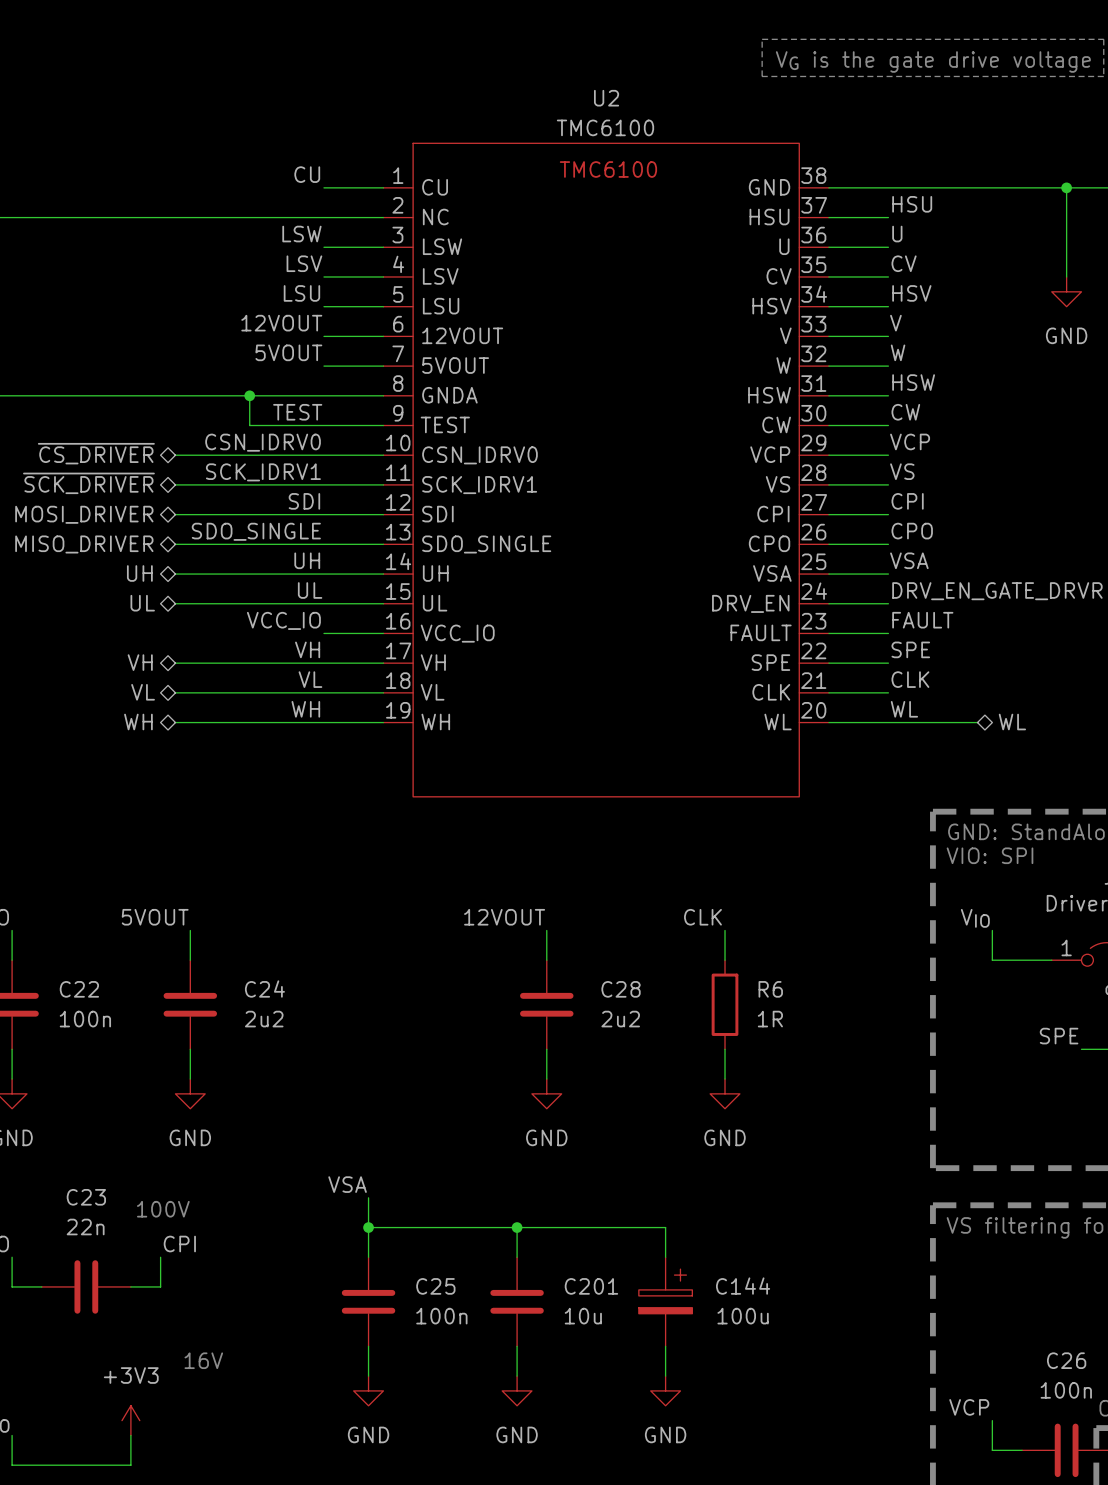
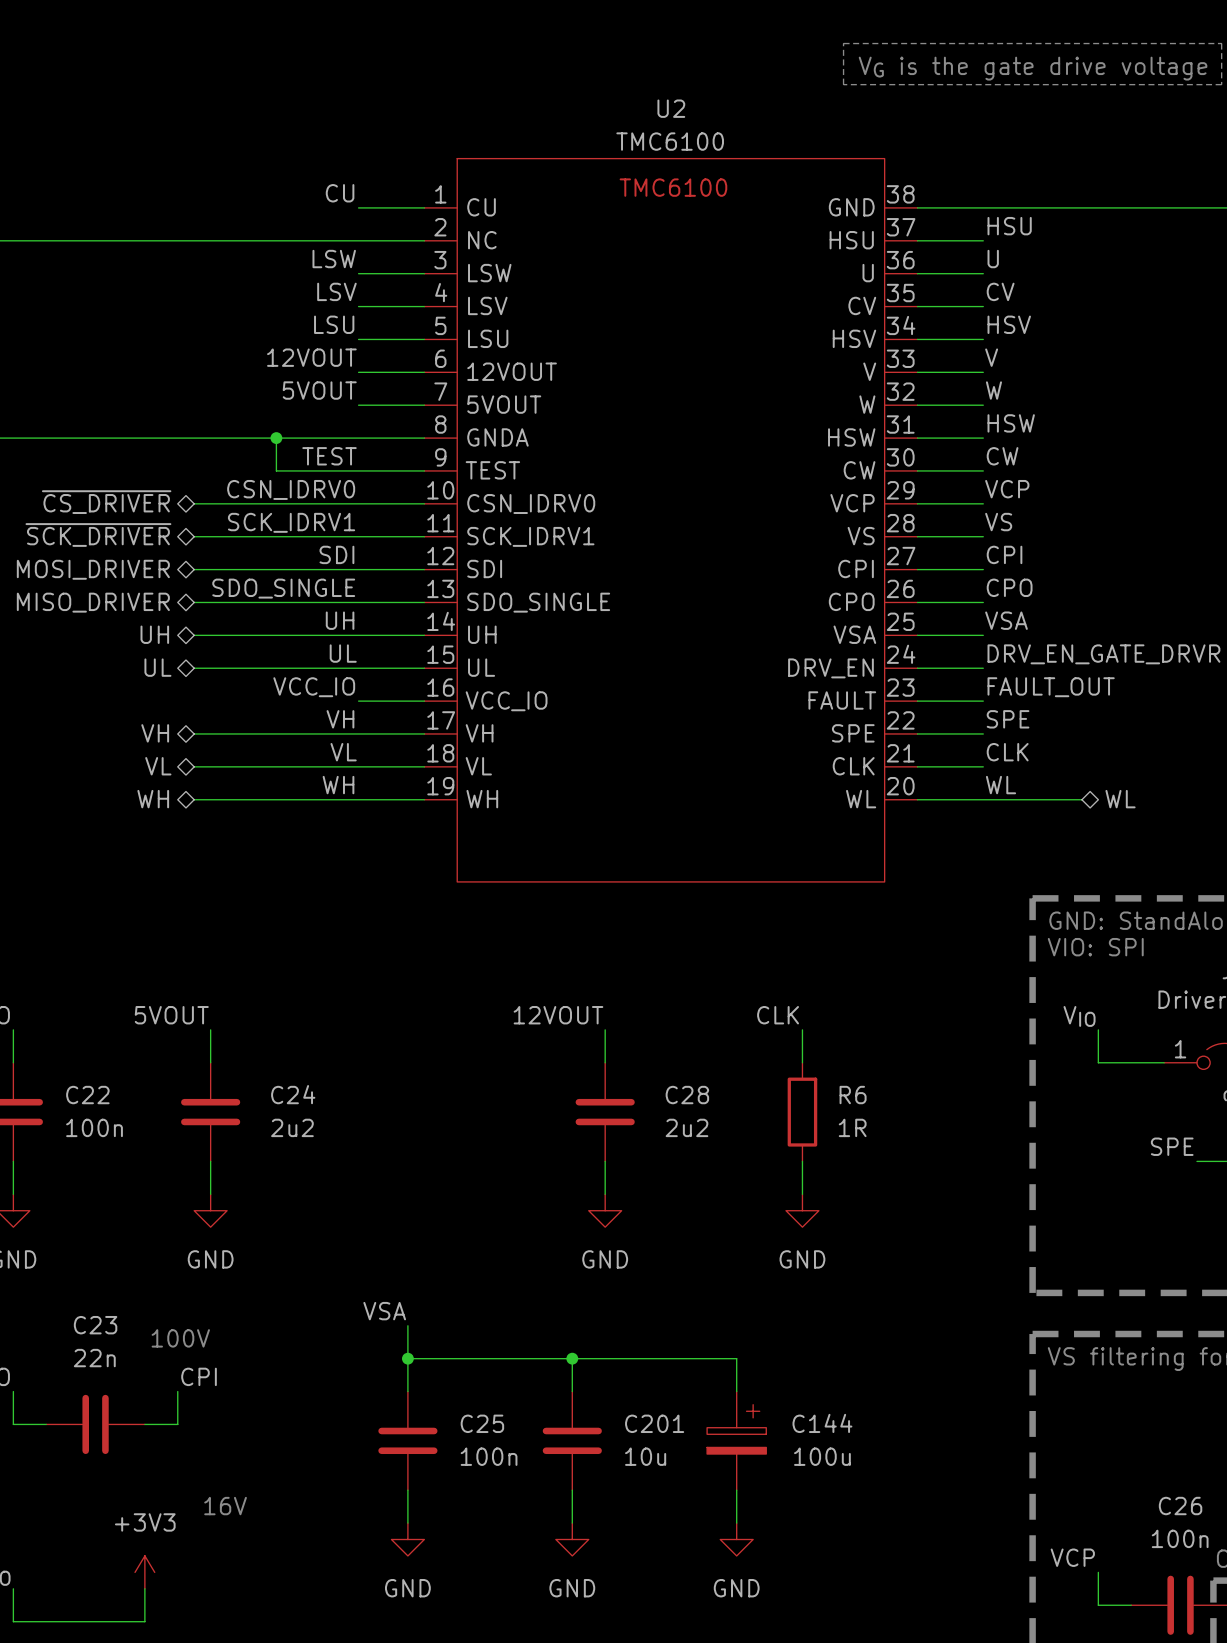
wire: (1066, 187) (1066, 276) -> none
junction: (1066, 187) -> none
power symbol: GND (1066, 291) -> none
label: FAULT (922, 620) -> FAULT_OUT (1051, 687)

